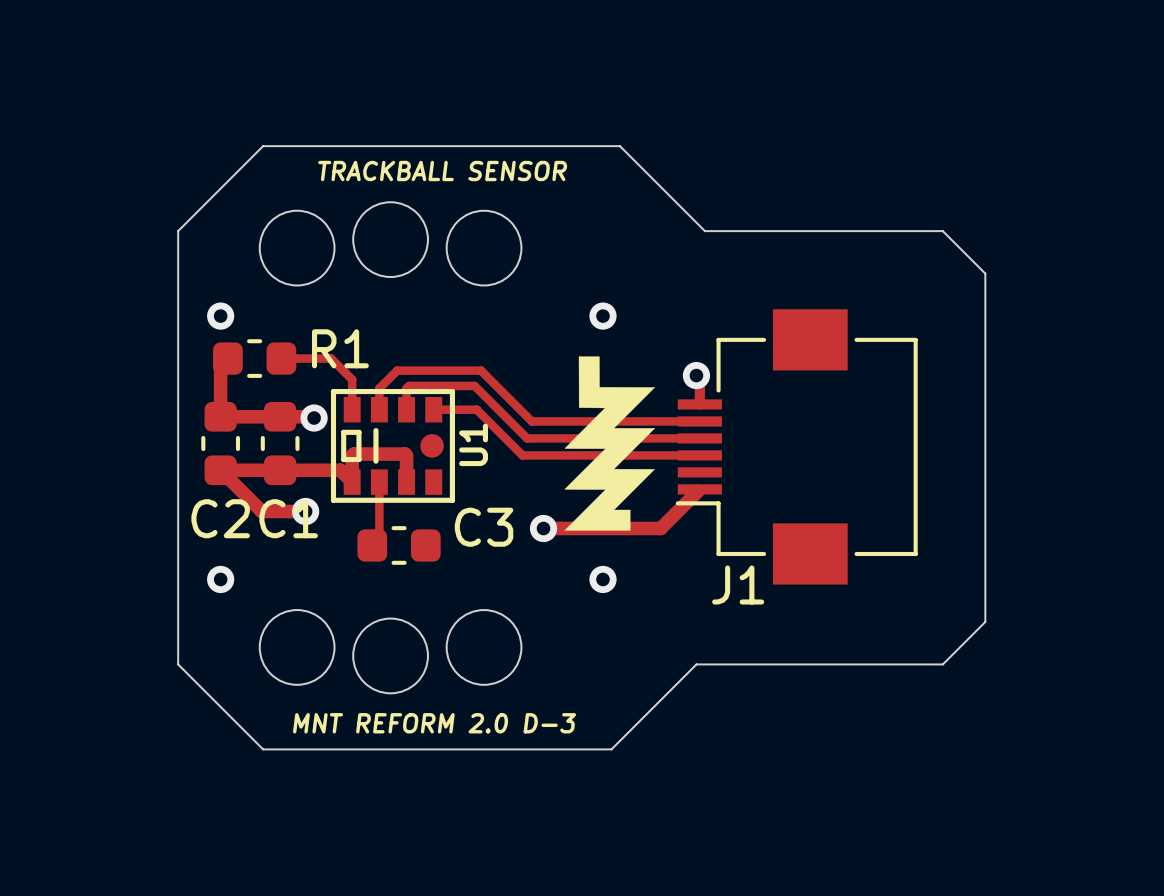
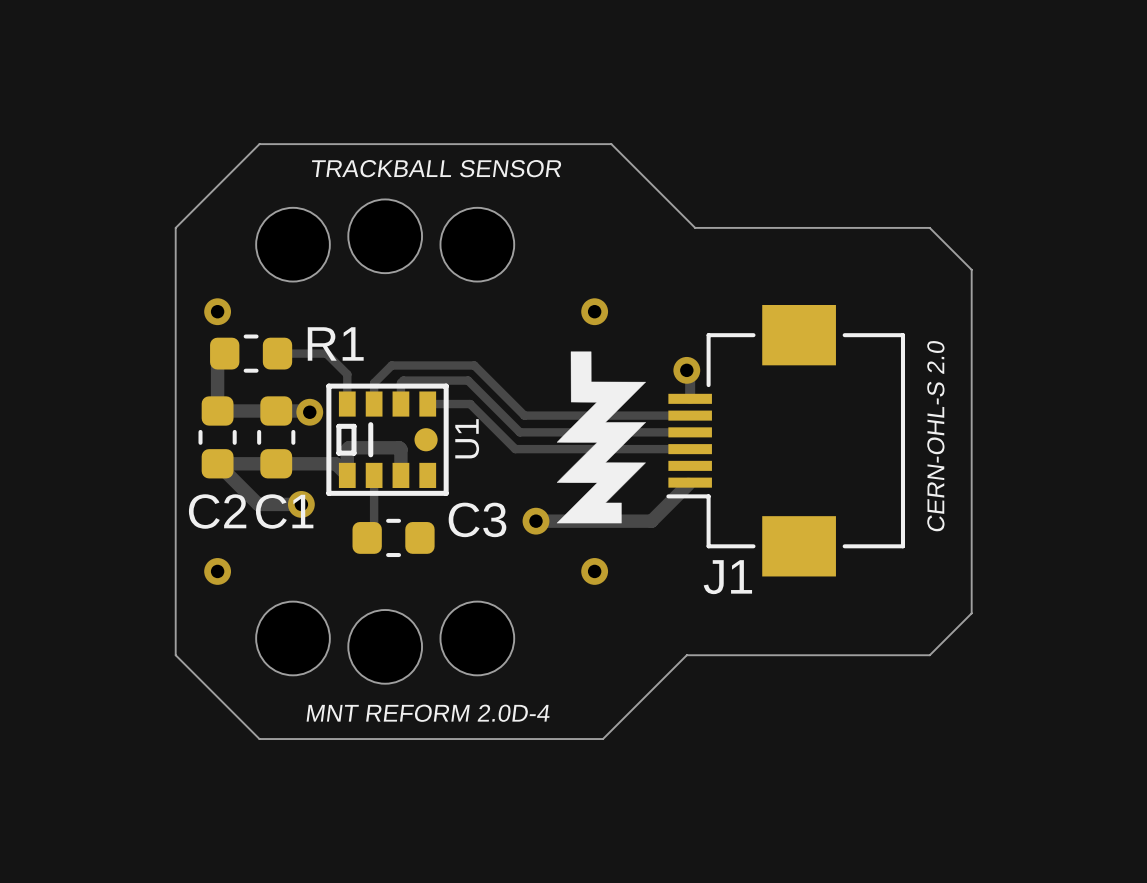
text: none -> CERN-OHL-S 2.0 (935, 436)
text: MNT REFORM 2.0 D-3 (434, 723) -> MNT REFORM 2.0D-4 (428, 713)

